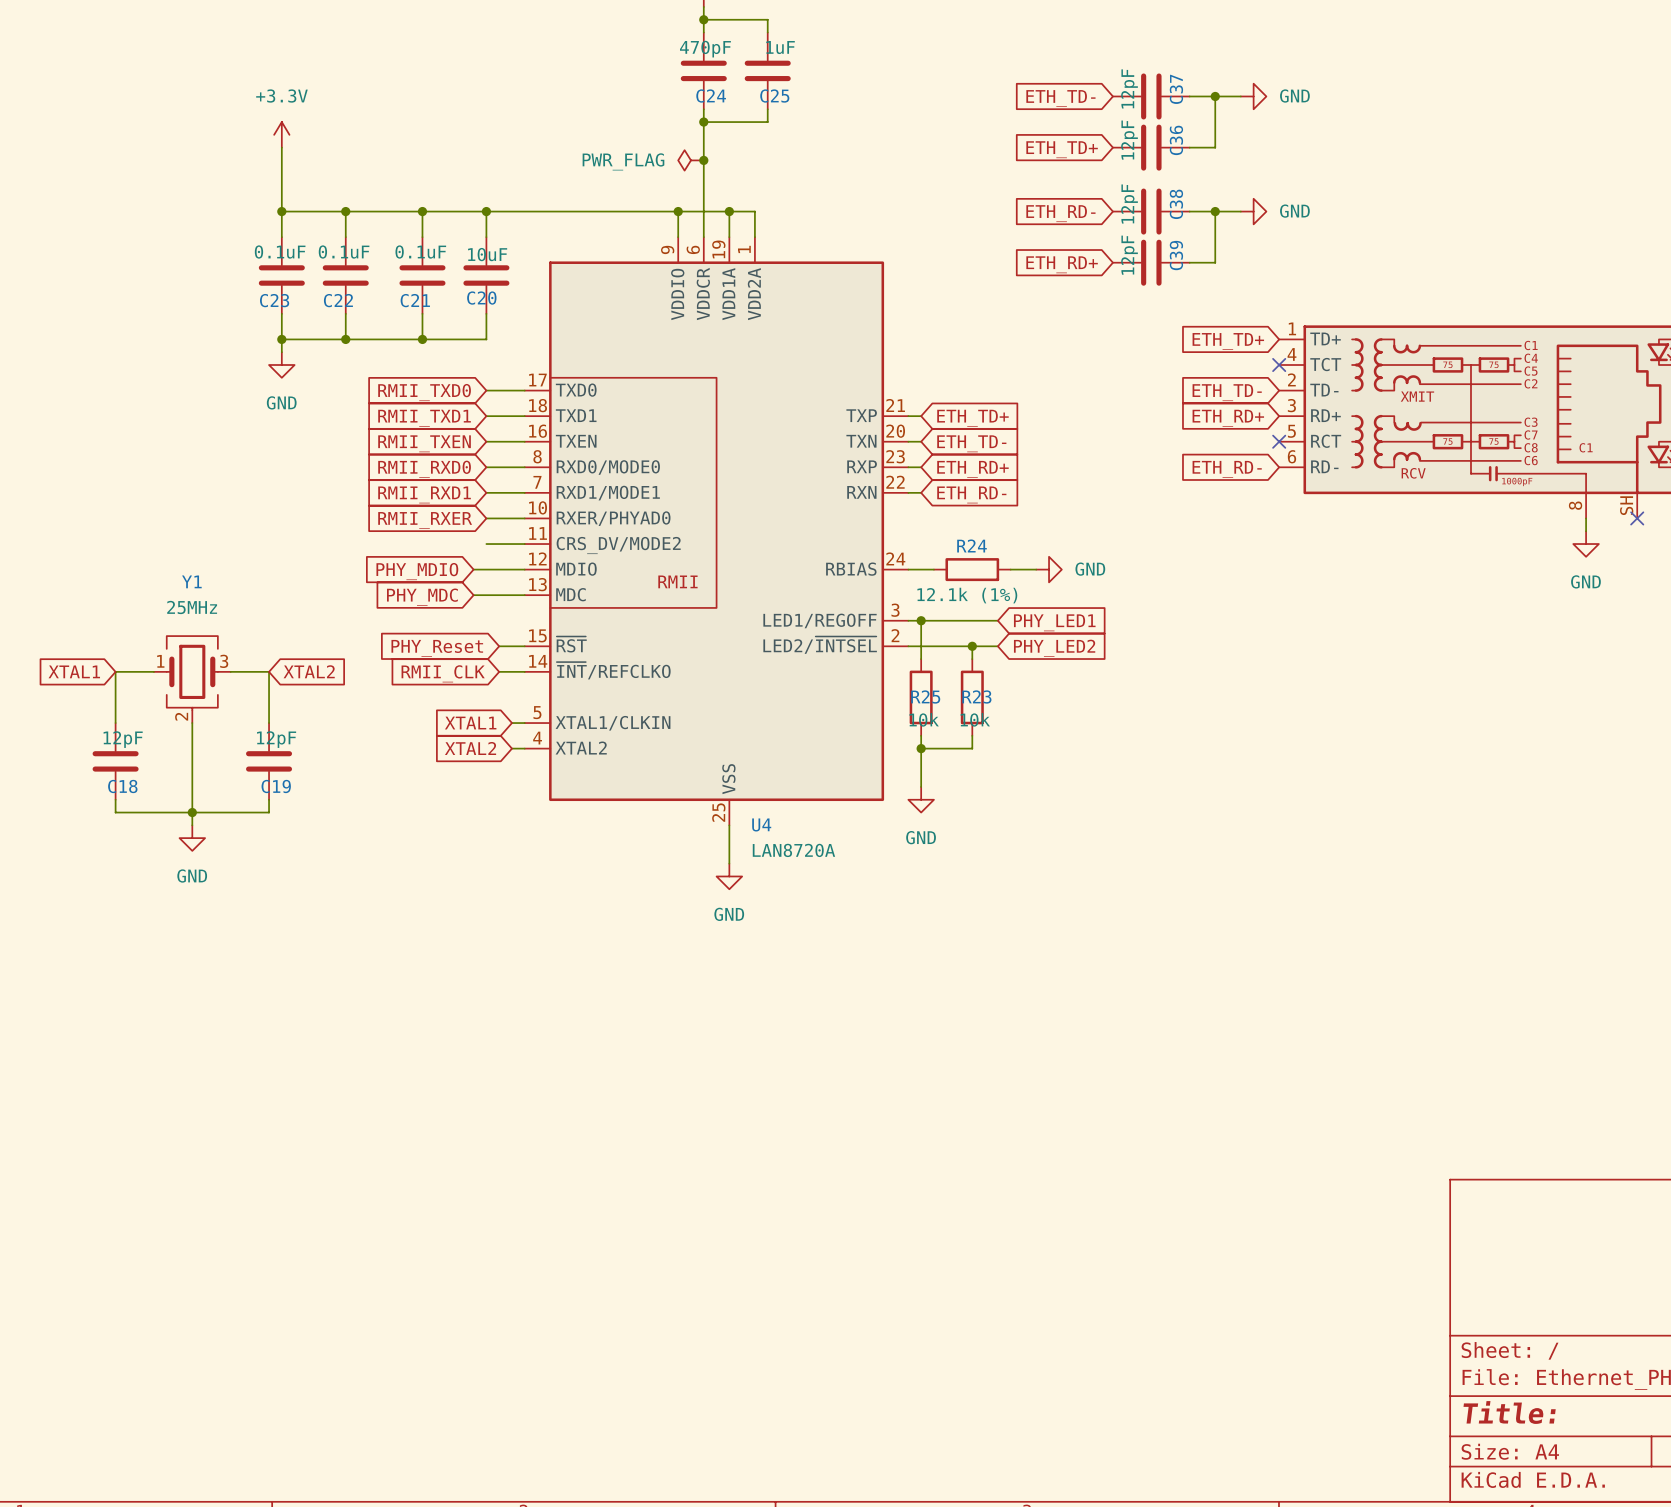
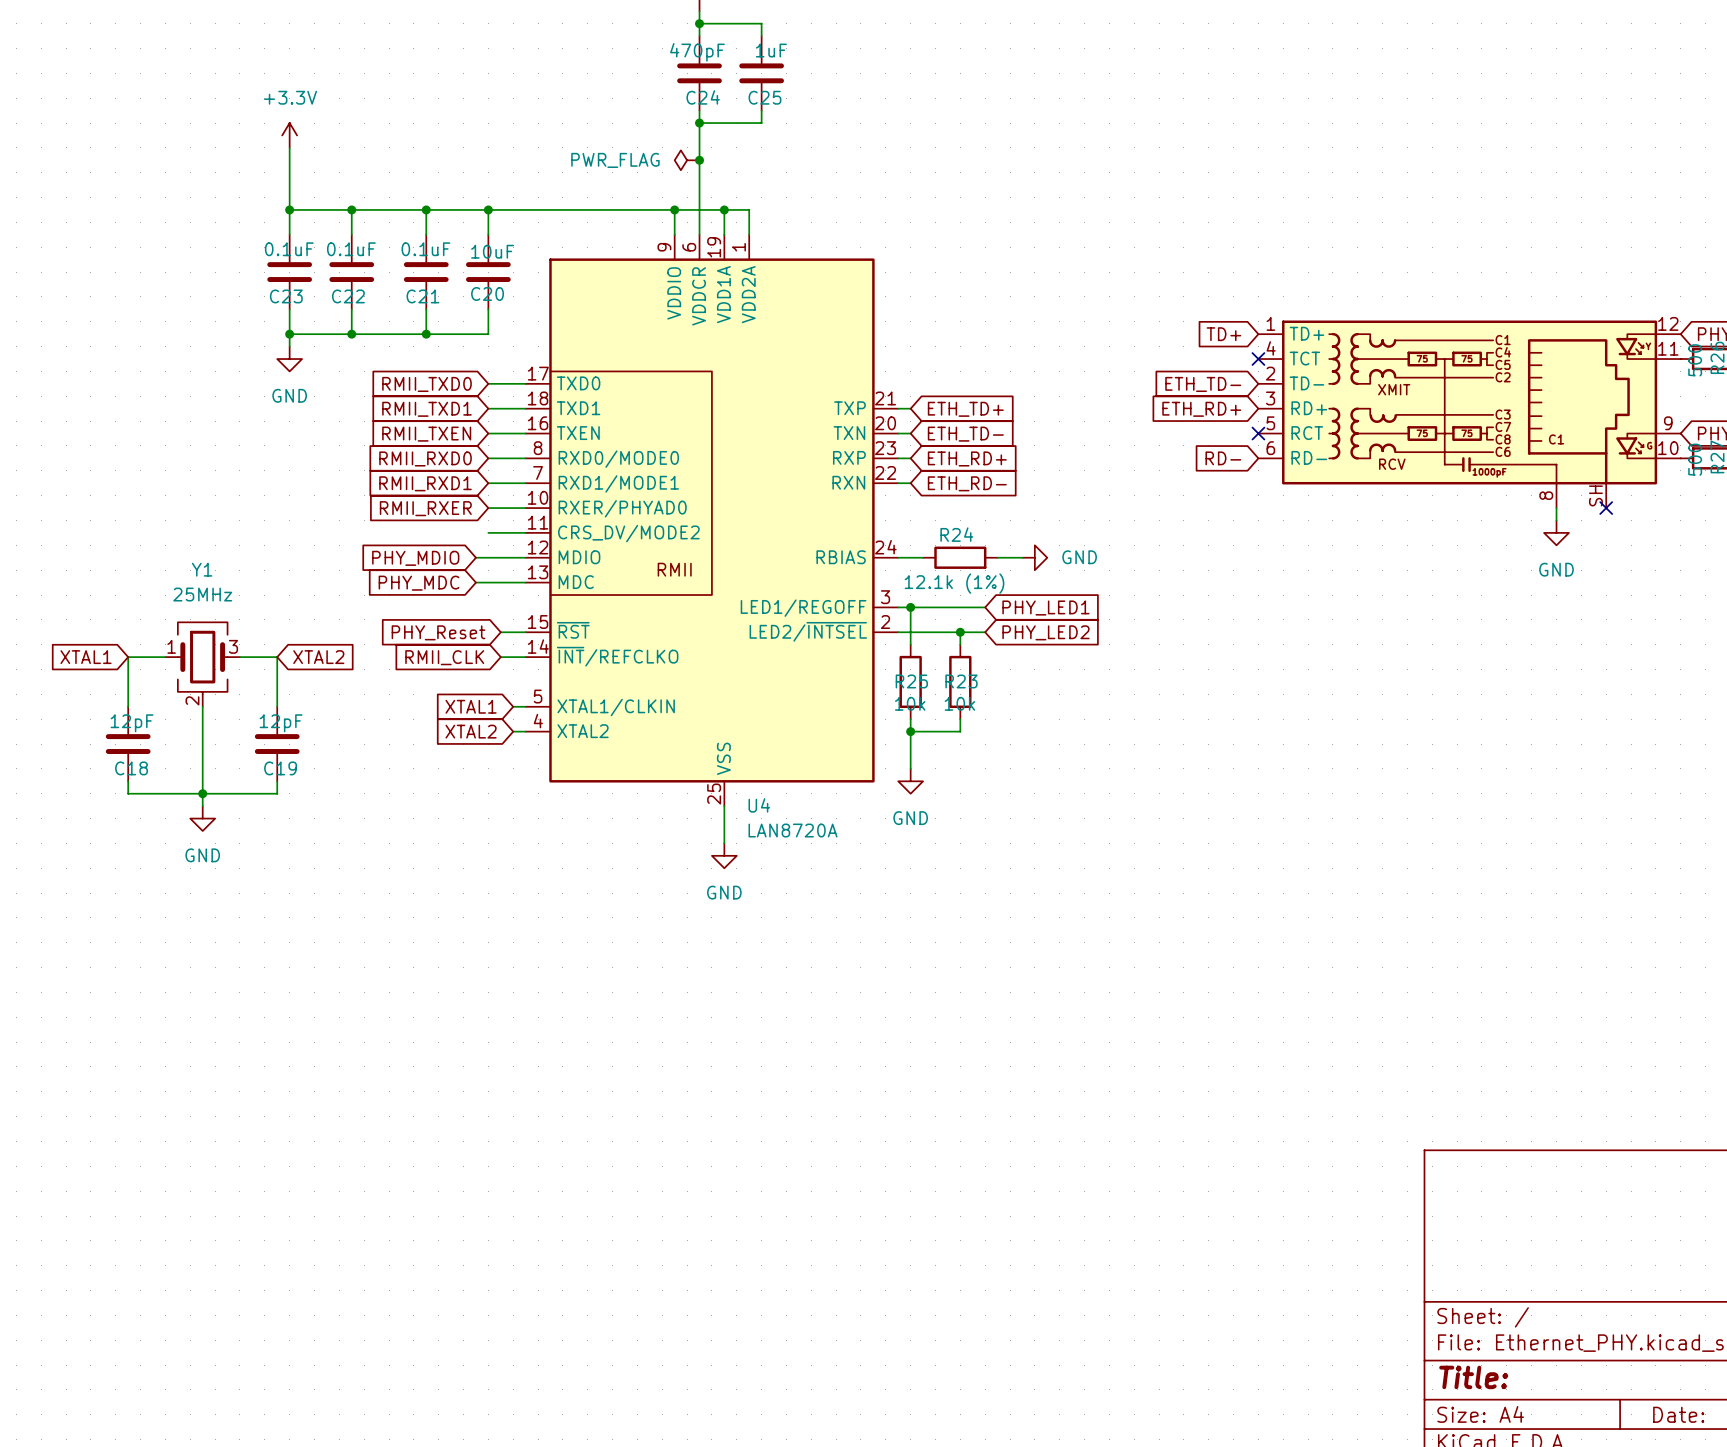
C37: 12pF (1151, 96) -> none
wire: (1189, 96) (1240, 96) -> none
wire: (1215, 96) (1215, 147) (1189, 147) -> none
junction: (1215, 96) -> none
power symbol: GND (1253, 96) -> none
global label: ETH_TD- (1060, 98) -> none
C36: 12pF (1151, 147) -> none
global label: ETH_TD+ (1062, 149) -> none
C38: 12pF (1151, 211) -> none
wire: (1189, 211) (1240, 211) -> none
wire: (1215, 211) (1215, 262) (1189, 262) -> none
junction: (1215, 211) -> none
power symbol: GND (1253, 211) -> none
global label: ETH_RD- (1060, 213) -> none
C39: 12pF (1151, 262) -> none
global label: ETH_RD+ (1062, 264) -> none
global label: ETH_TD+ (1228, 341) -> TD+ (1223, 334)
global label: ETH_RD- (1227, 469) -> RD- (1223, 458)

